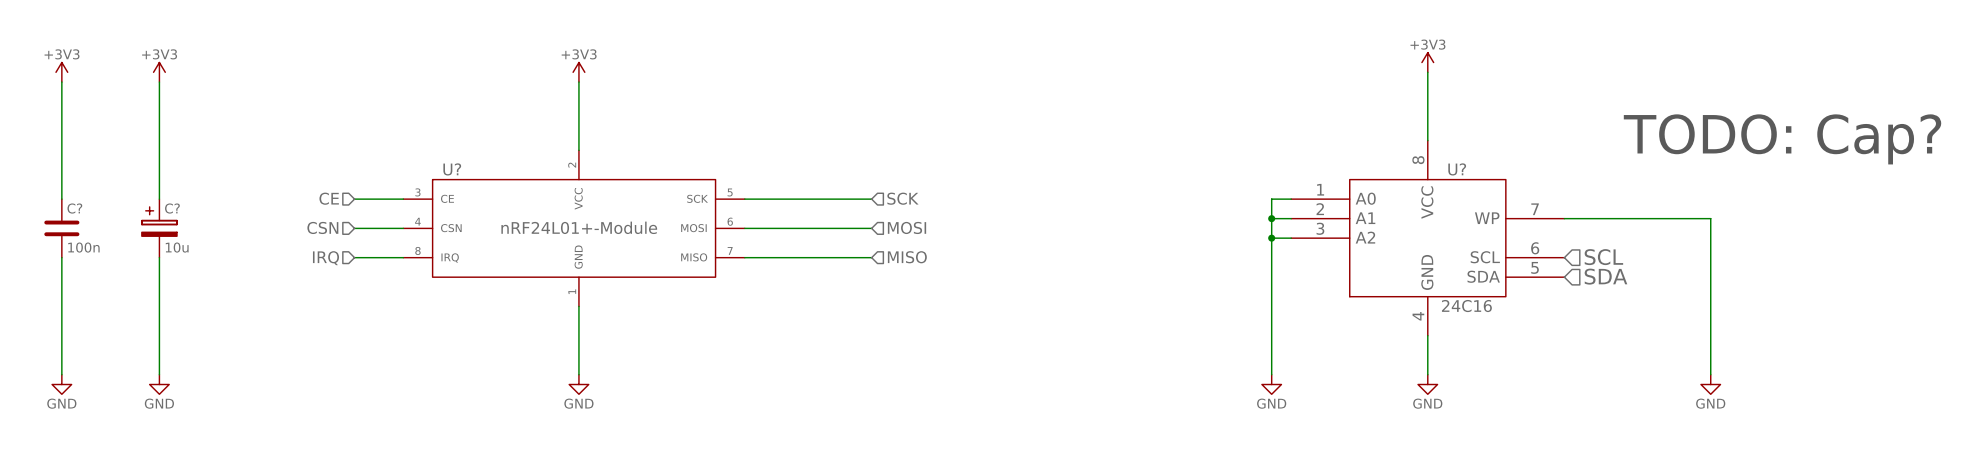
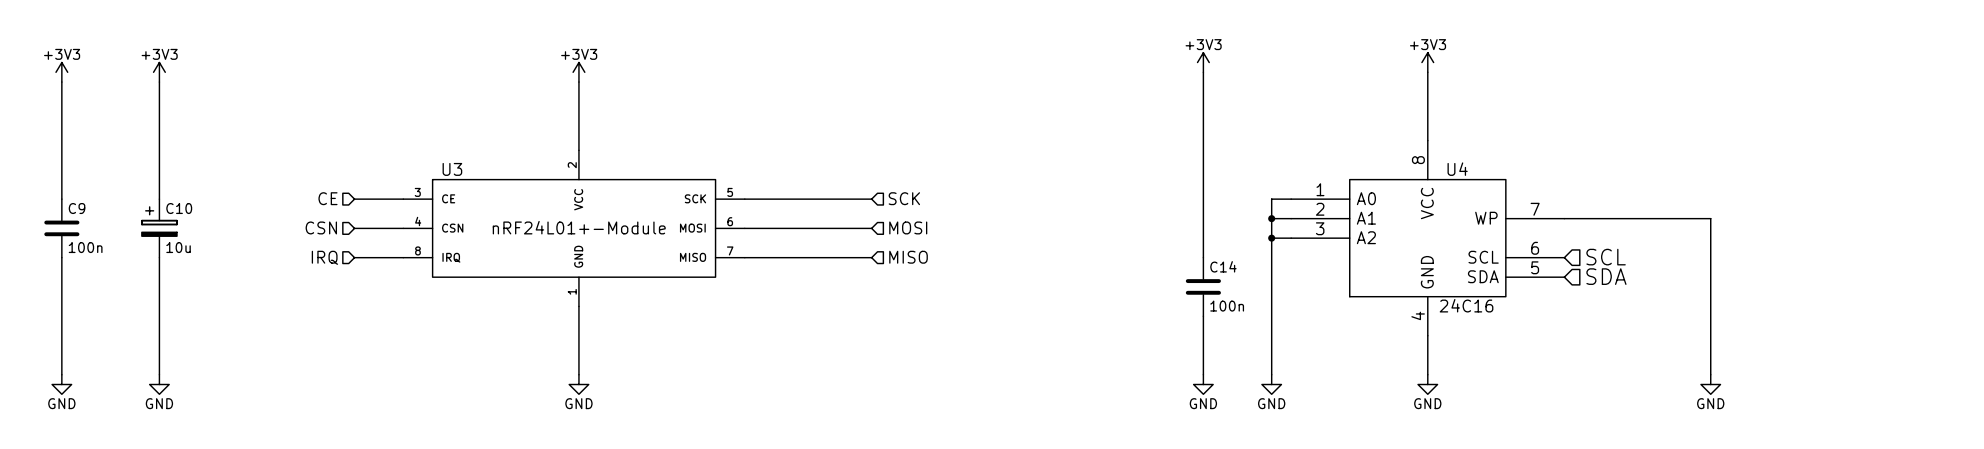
power symbol: none -> +3V3 (1203, 62)
wire: none -> (1203, 72) (1203, 257)
text: TODO: Cap? (1782, 139) -> none
U? name: U? (452, 169) -> U3 (452, 169)
U? name: U? (1457, 169) -> U4 (1457, 169)
C? name: C? (74, 208) -> C9 (77, 208)
C? name: C? (172, 208) -> C10 (179, 208)
C14: none -> 100n (1203, 286)
wire: none -> (1203, 316) (1203, 374)
power symbol: none -> GND (1203, 384)

